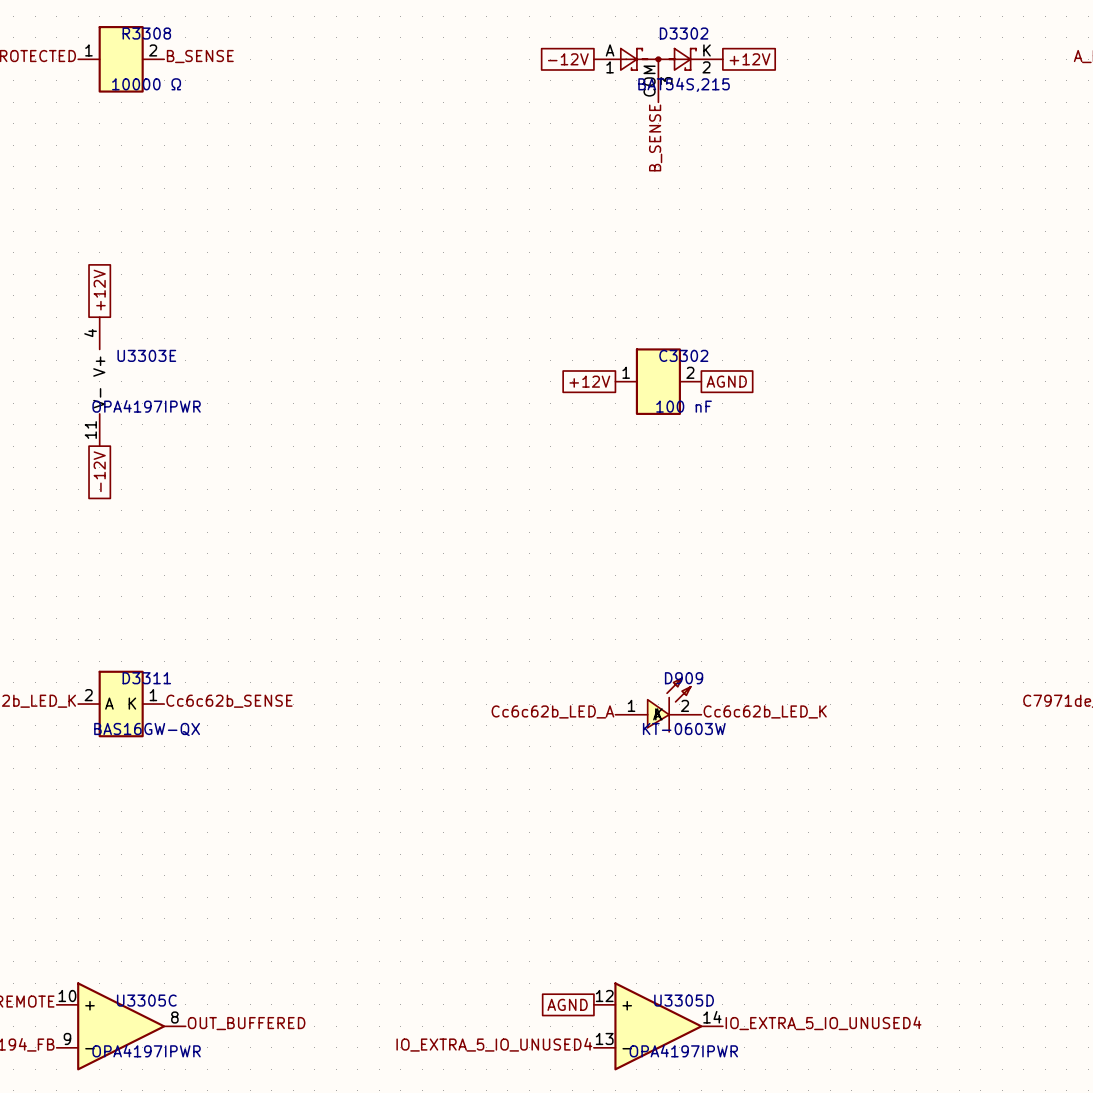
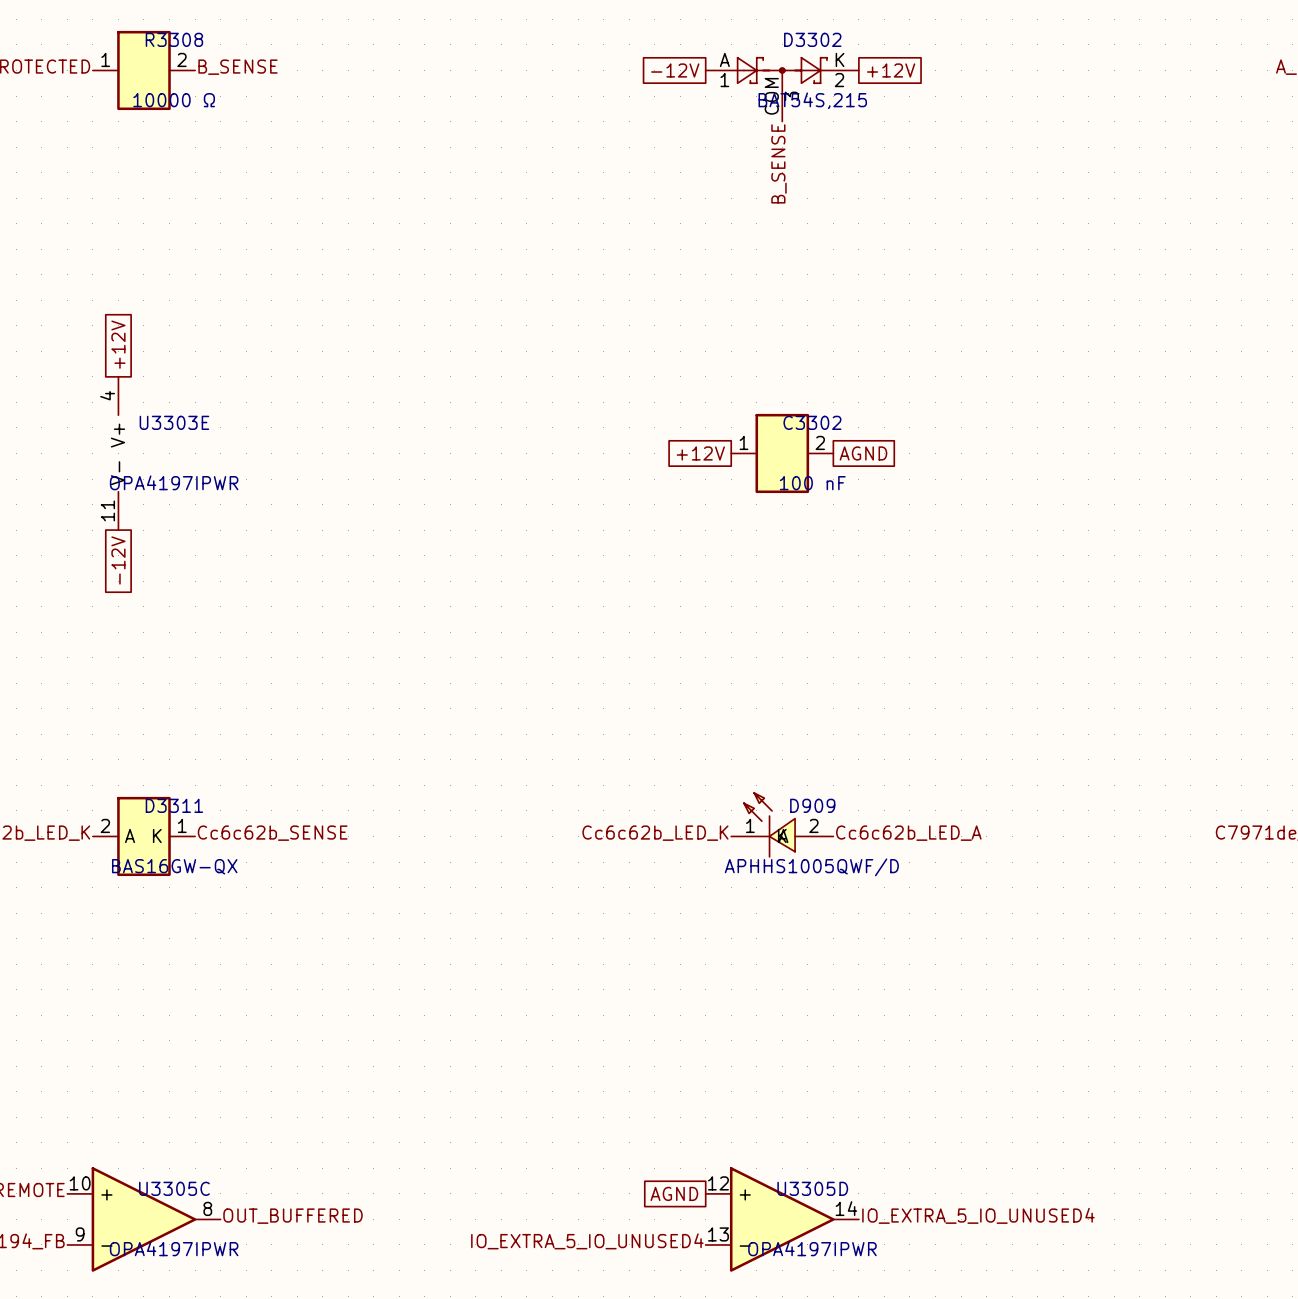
D909 symbol: [615, 678, 702, 732] -> [731, 793, 834, 857]
label position: Cc6c62b_LED_A (552, 711) -> Cc6c62b_LED_A (908, 833)
label position: Cc6c62b_LED_K (765, 711) -> Cc6c62b_LED_K (655, 833)
D909 value: KT-0603W (684, 728) -> APHHS1005QWF/D (811, 867)

